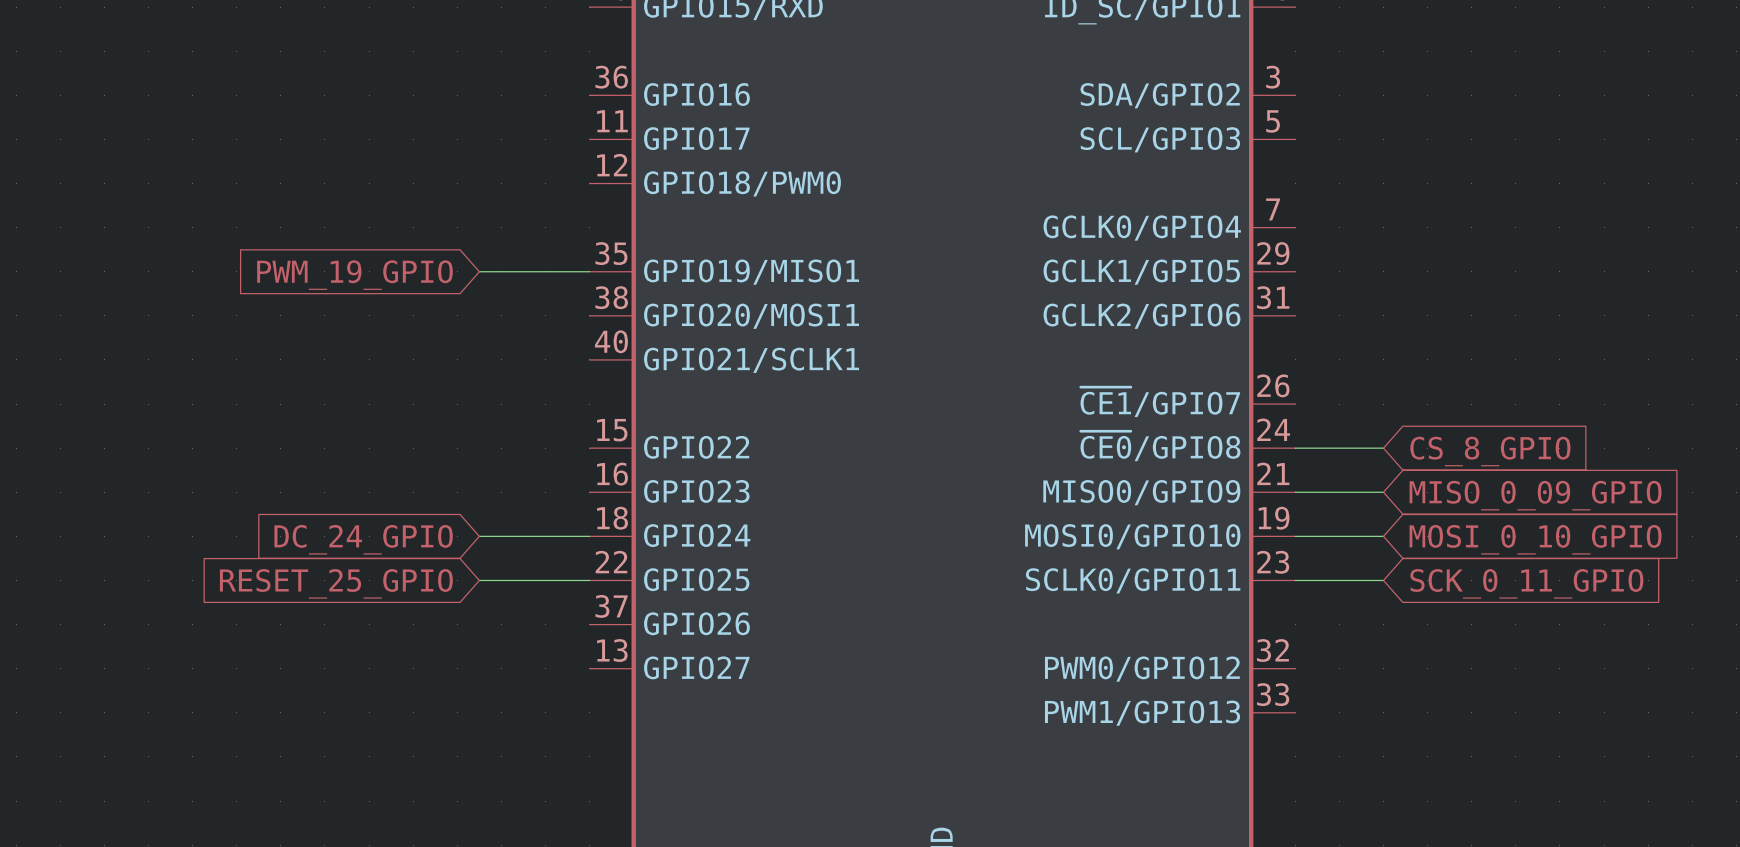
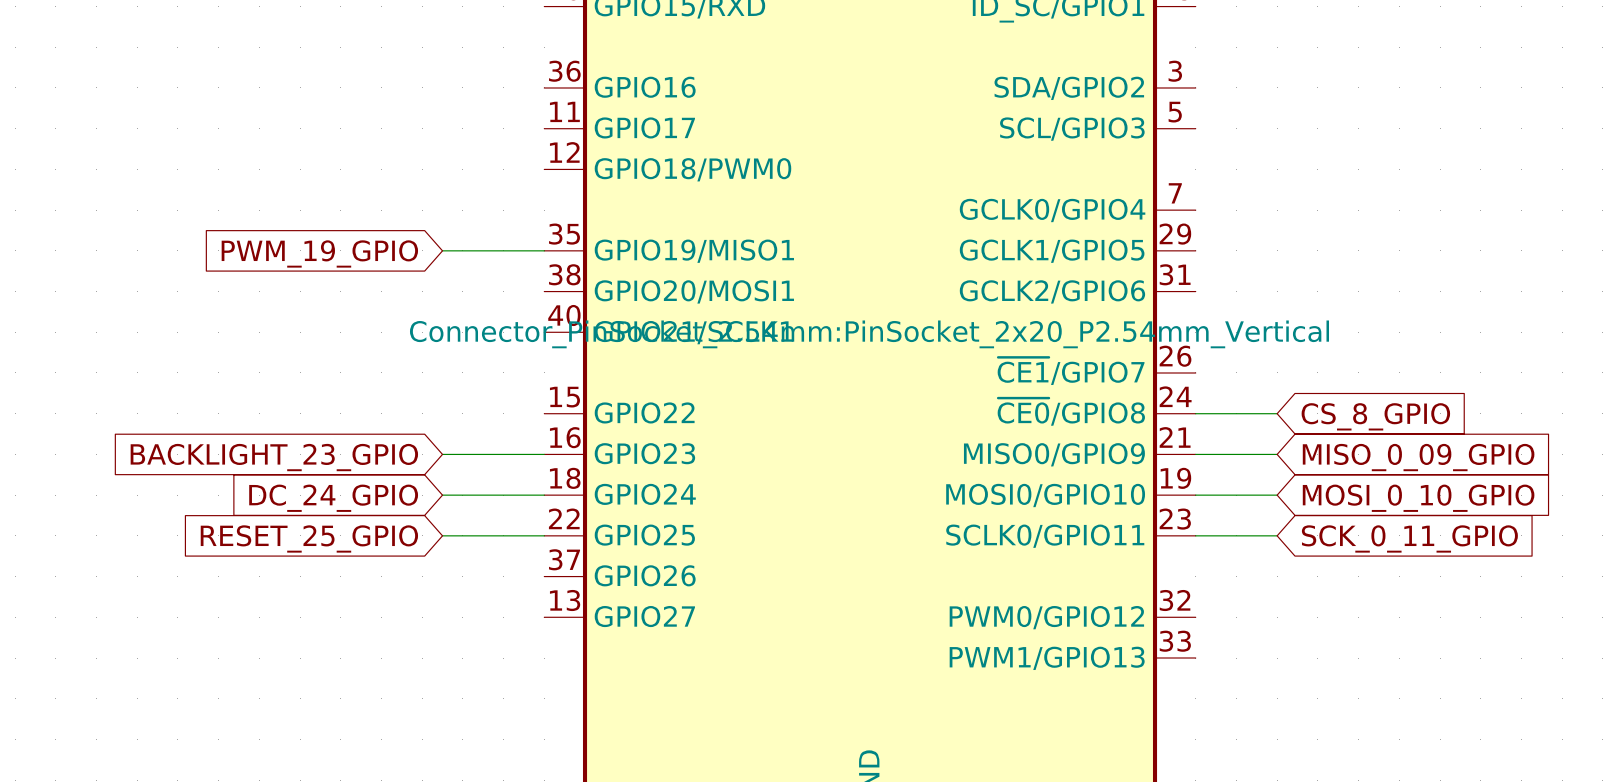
part text: none -> Connector_PinSocket_2.54mm:PinSocket_2x20_P2.54mm_Vertical (869, 334)
wire: none -> (442, 454) (544, 454)
global label: none -> BACKLIGHT_23_GPIO (274, 457)

